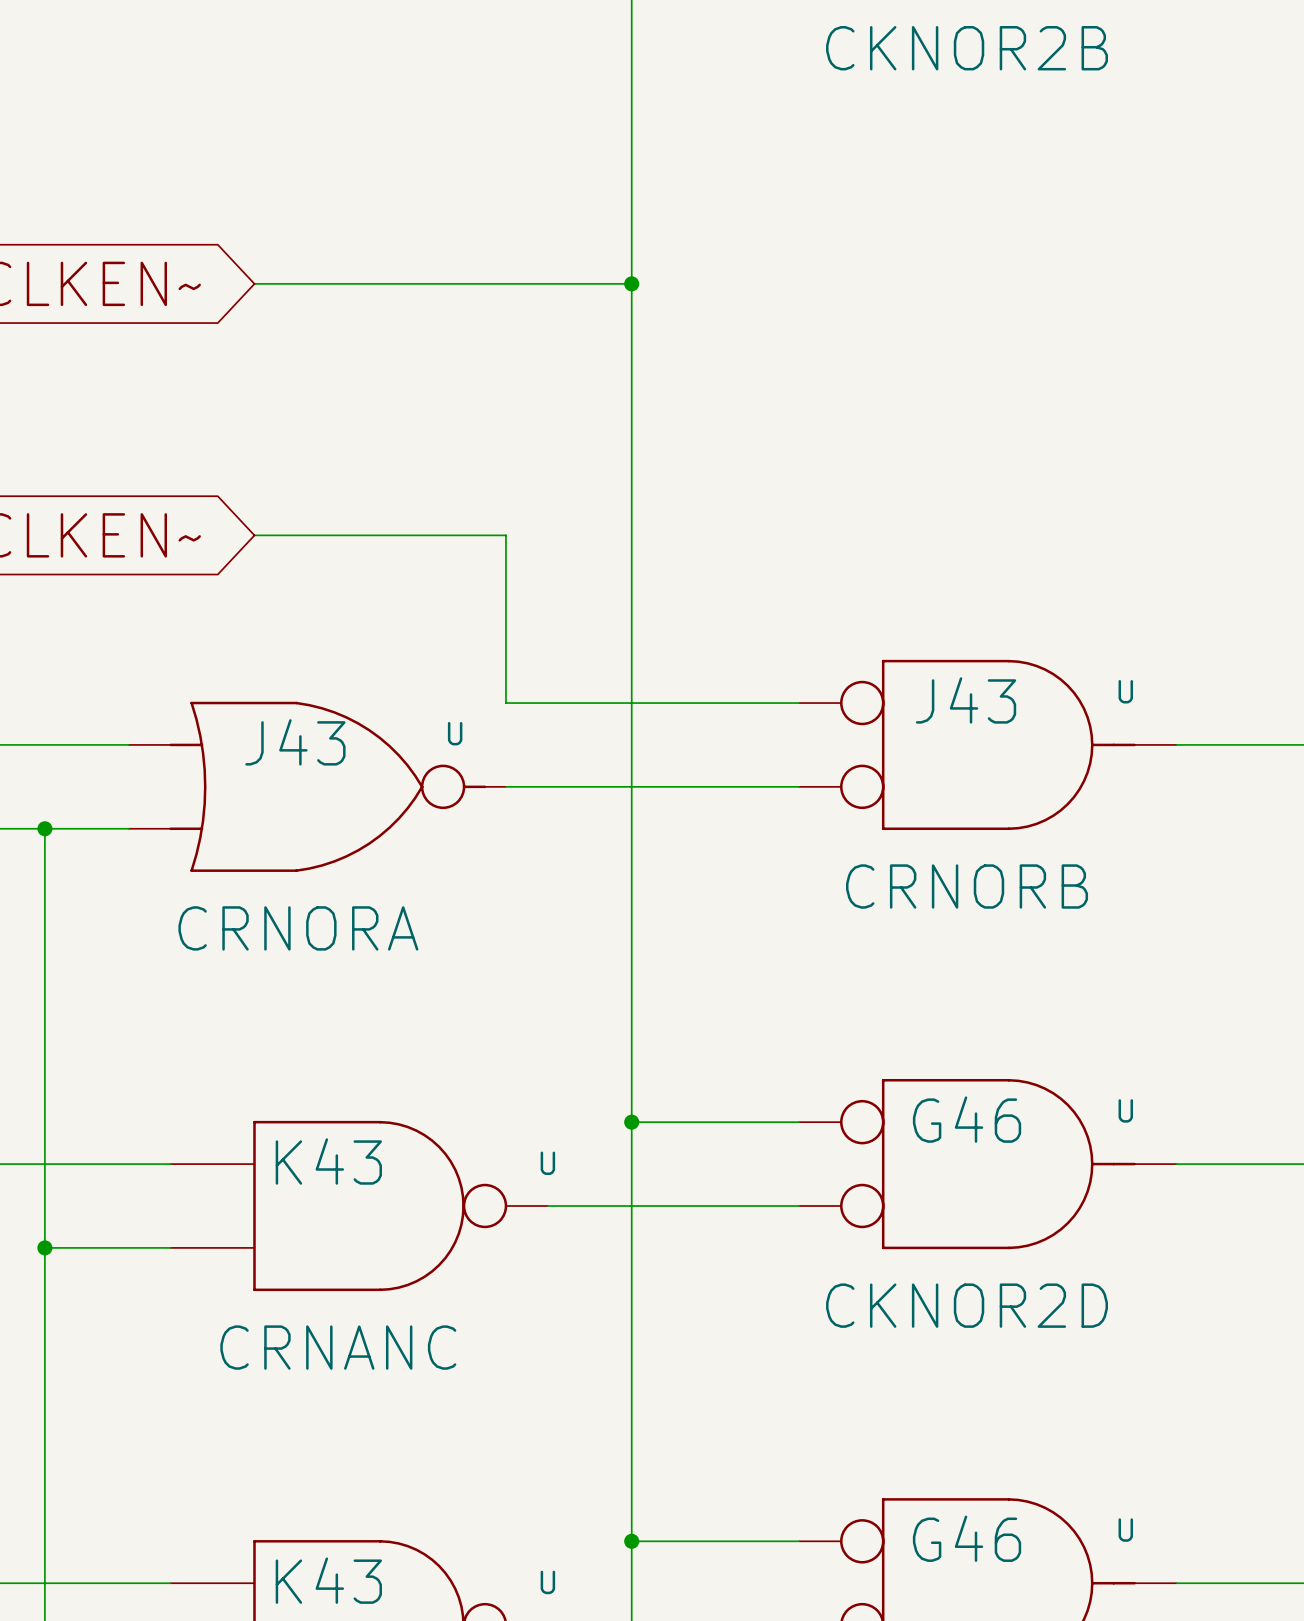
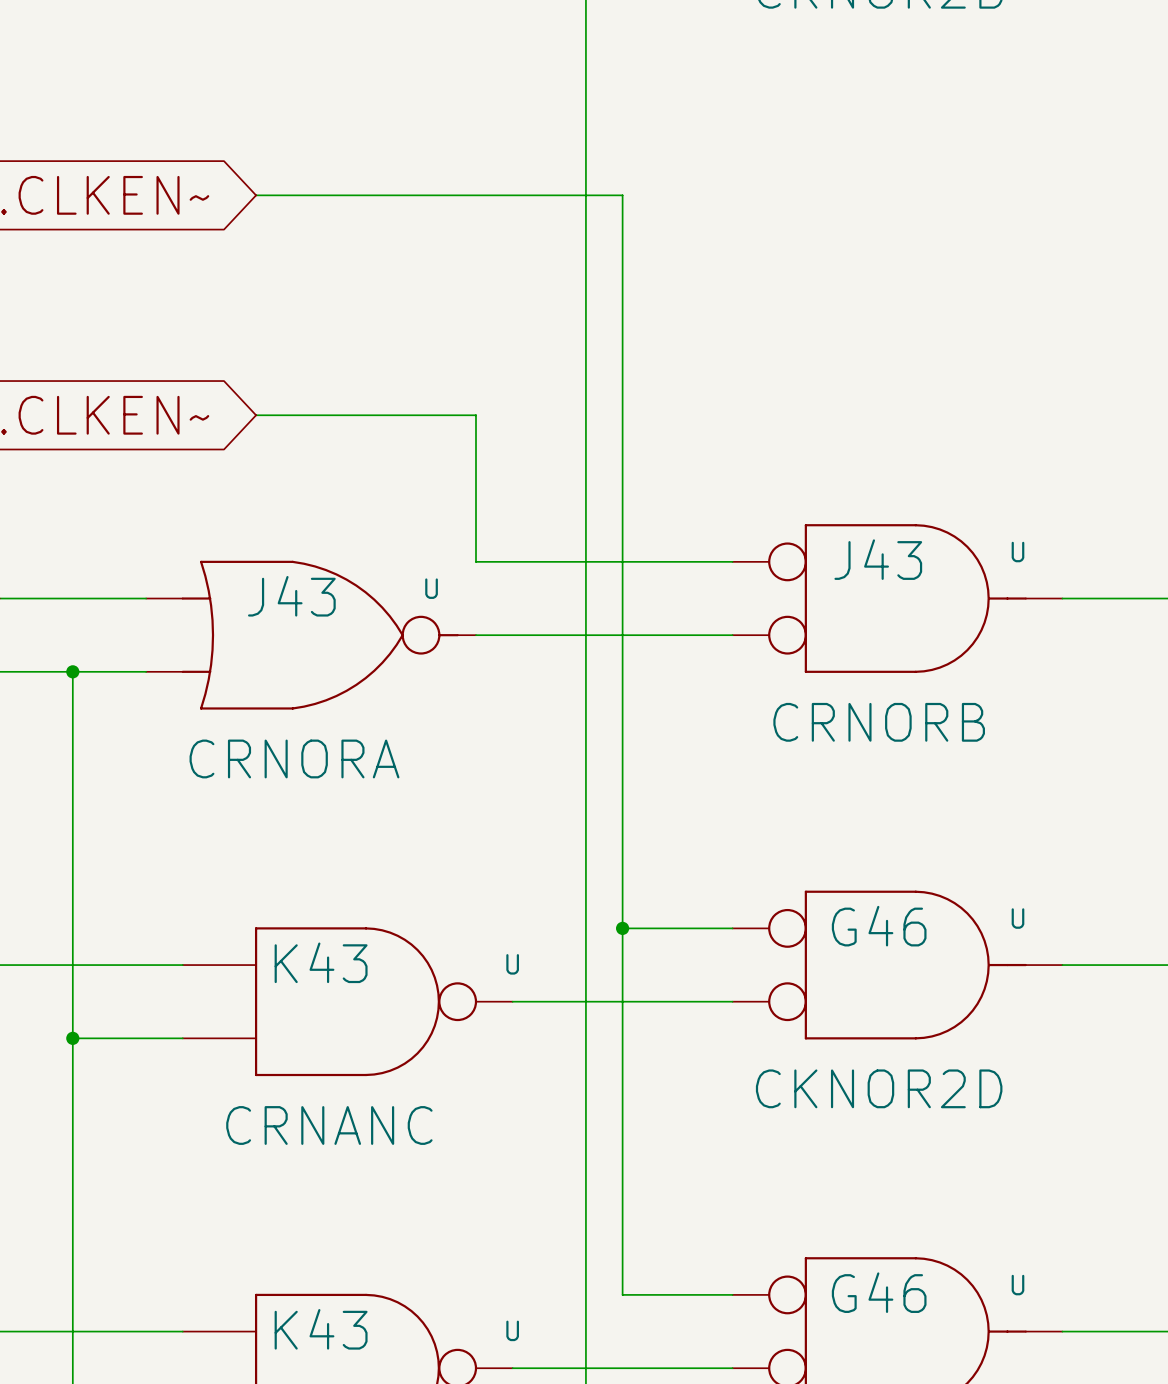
junction: (631, 283) -> none
wire: (631, 1122) (673, 1122) -> none
junction position: (631, 1122) -> (622, 928)
wire: (631, 1541) (673, 1541) -> (585, 195) (622, 195) (622, 1294)
junction: (631, 1541) -> none

